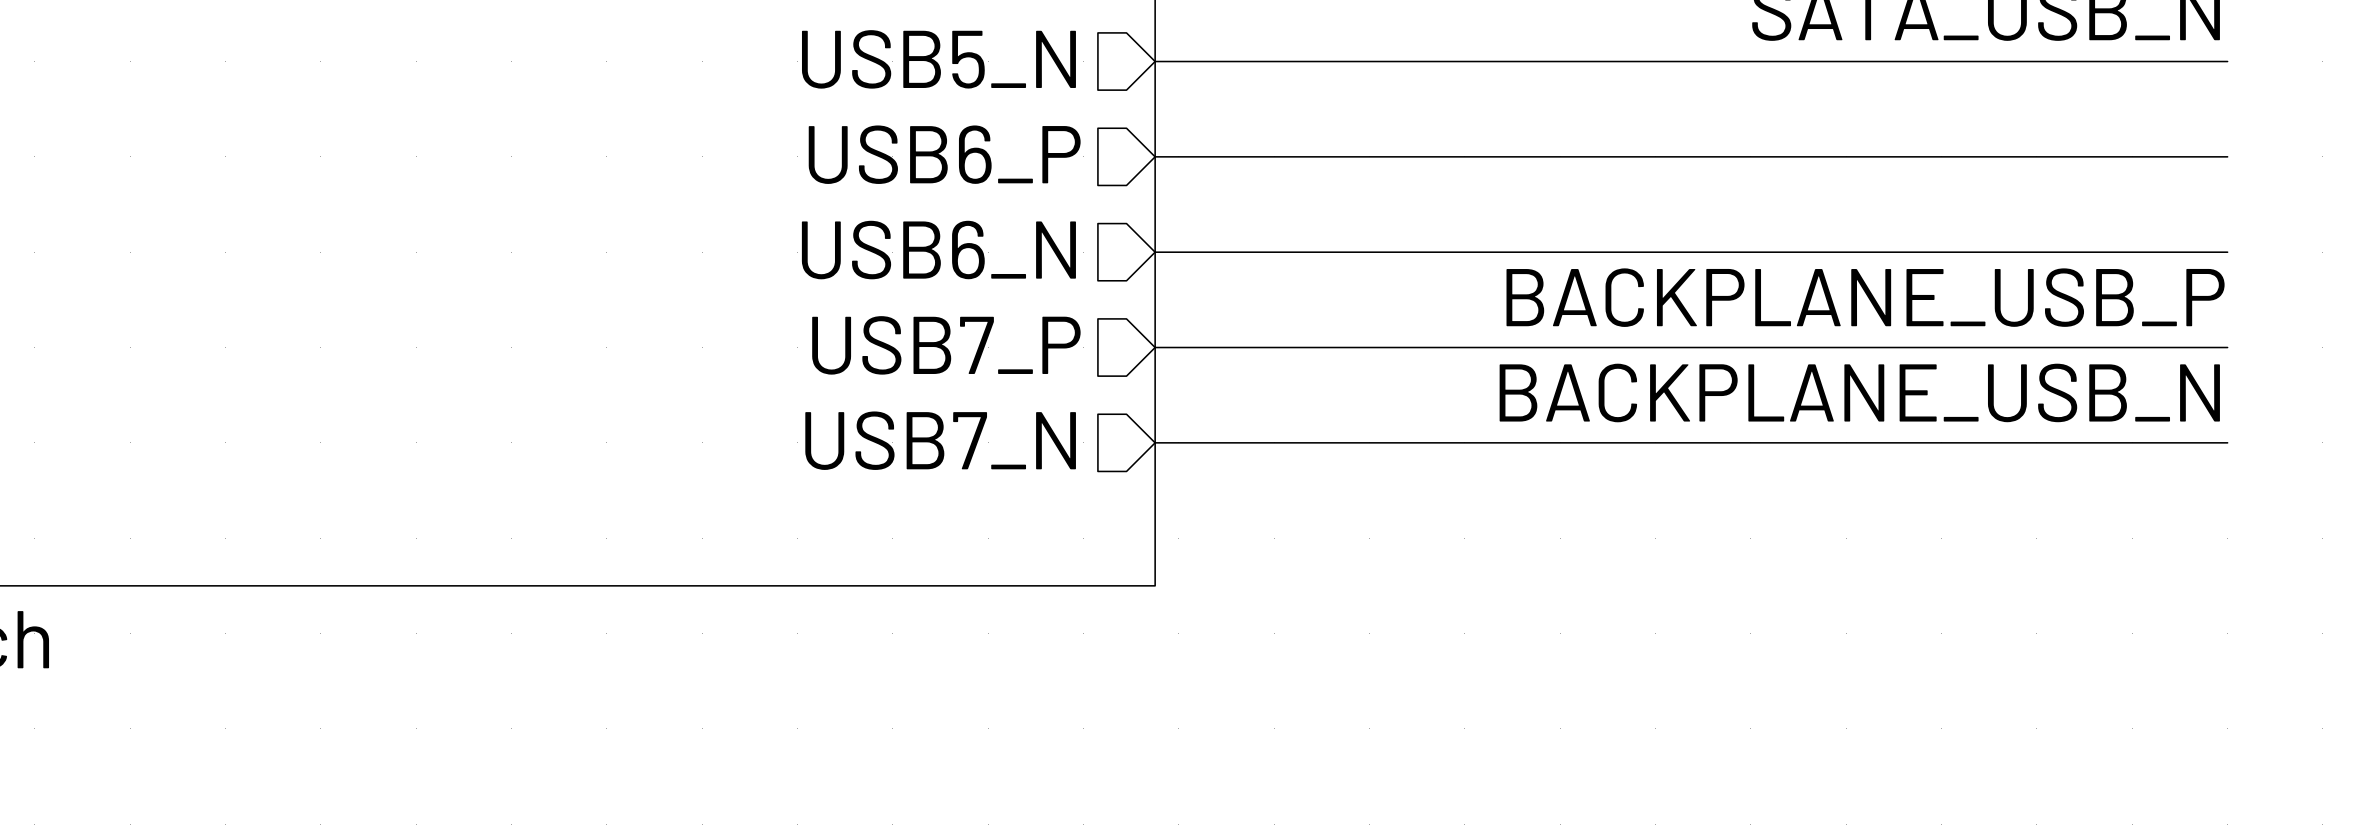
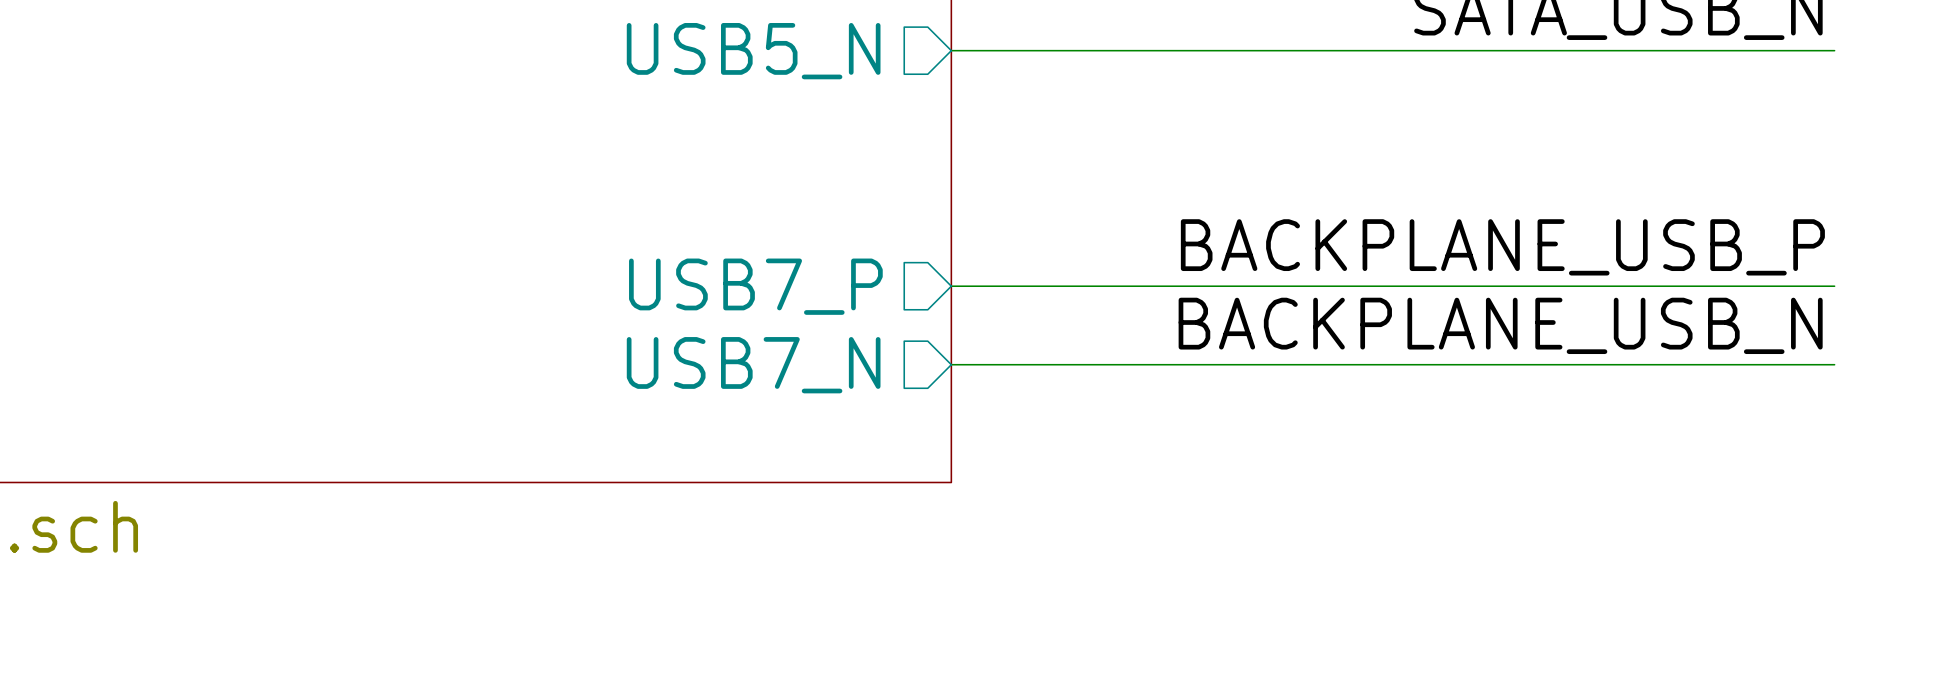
sheet pin: USB6_P (944, 154) -> none
wire: (1155, 156) (2227, 156) -> none
sheet pin: USB6_N (938, 250) -> none
wire: (1155, 252) (2227, 252) -> none

